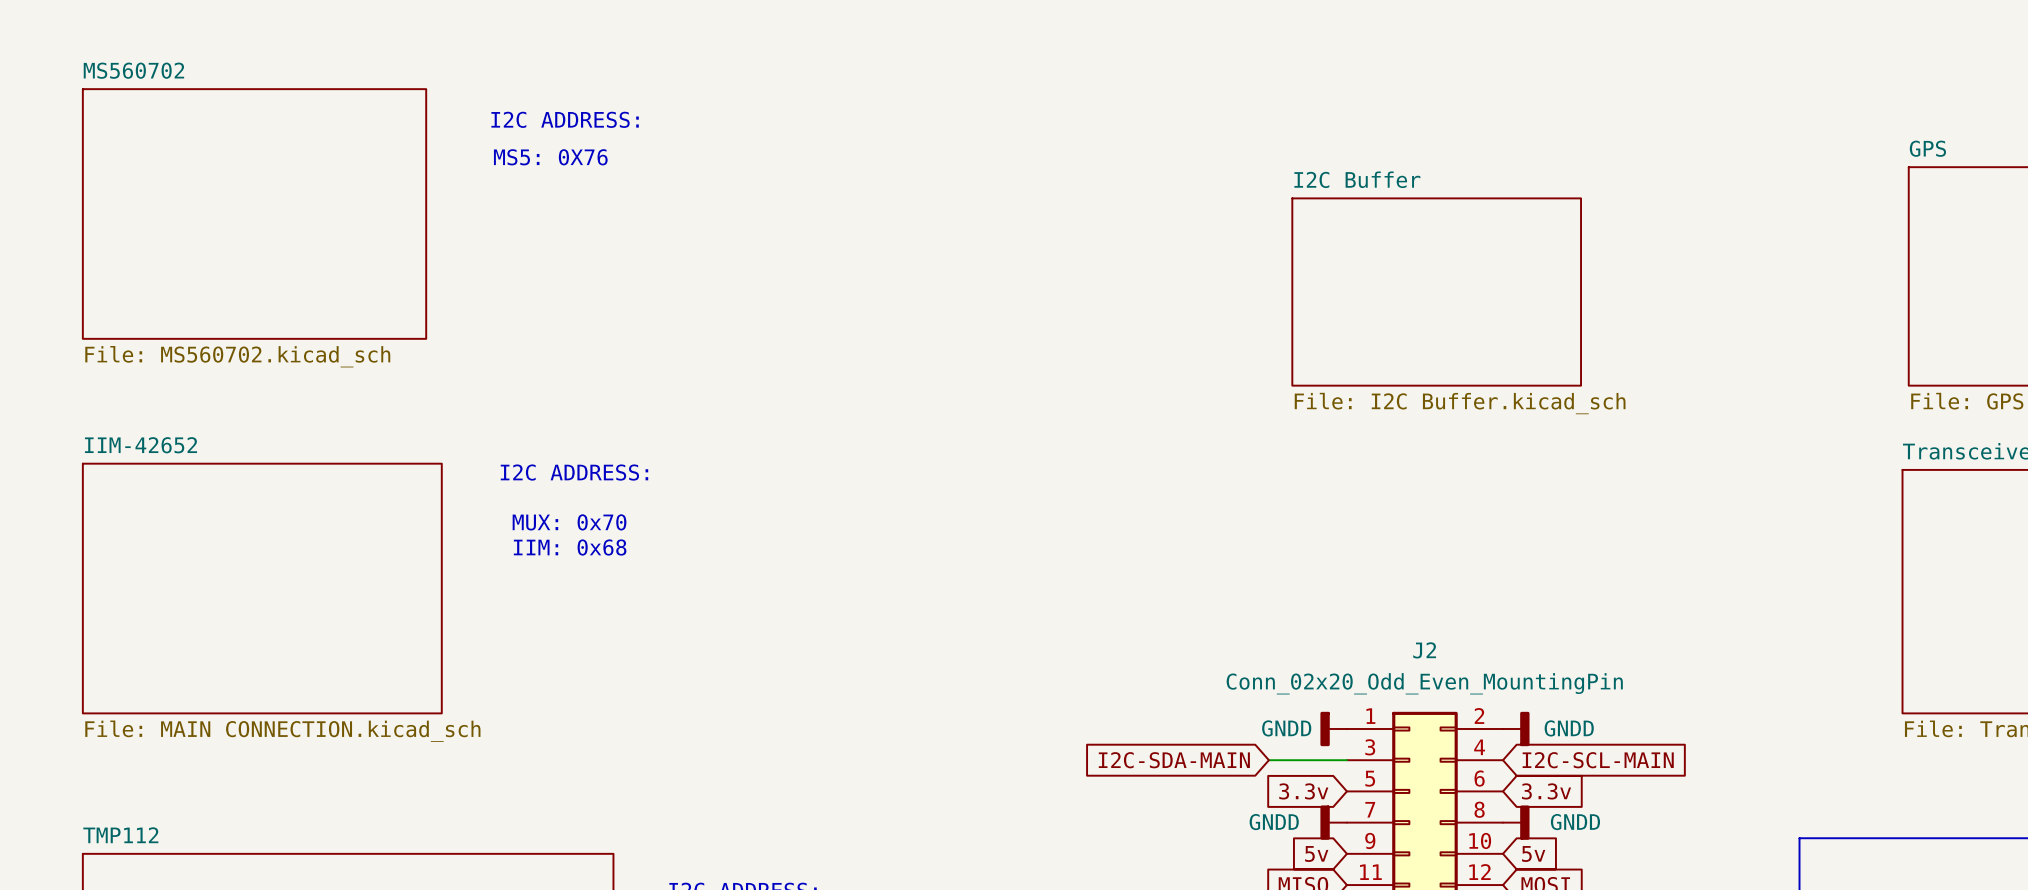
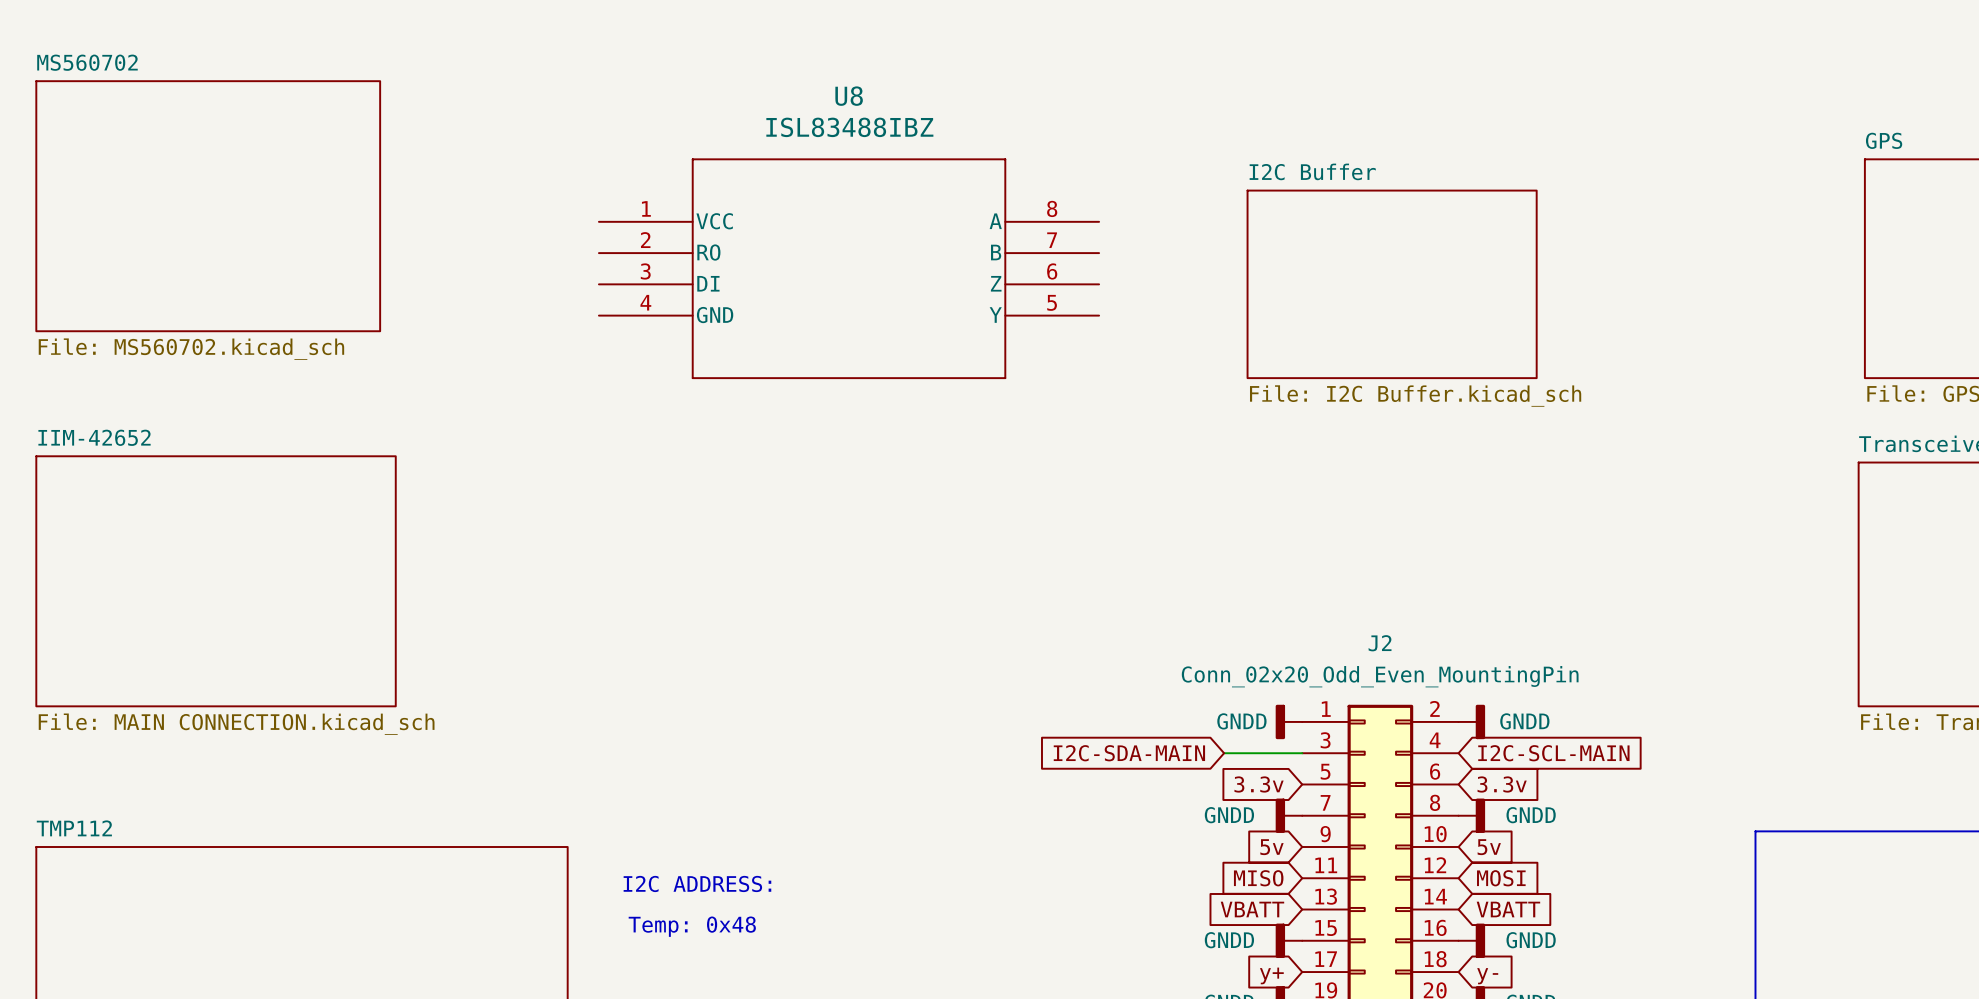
text: I2C ADDRESS: (565, 119) -> none
text: MS5: 0X76 (550, 157) -> none
U8: none -> ISL83488IBZ (849, 268)
text: I2C ADDRESS: (574, 472) -> none
text: MUX: 0x70 (569, 522) -> none
text: IIM: 0x68 (570, 547) -> none

